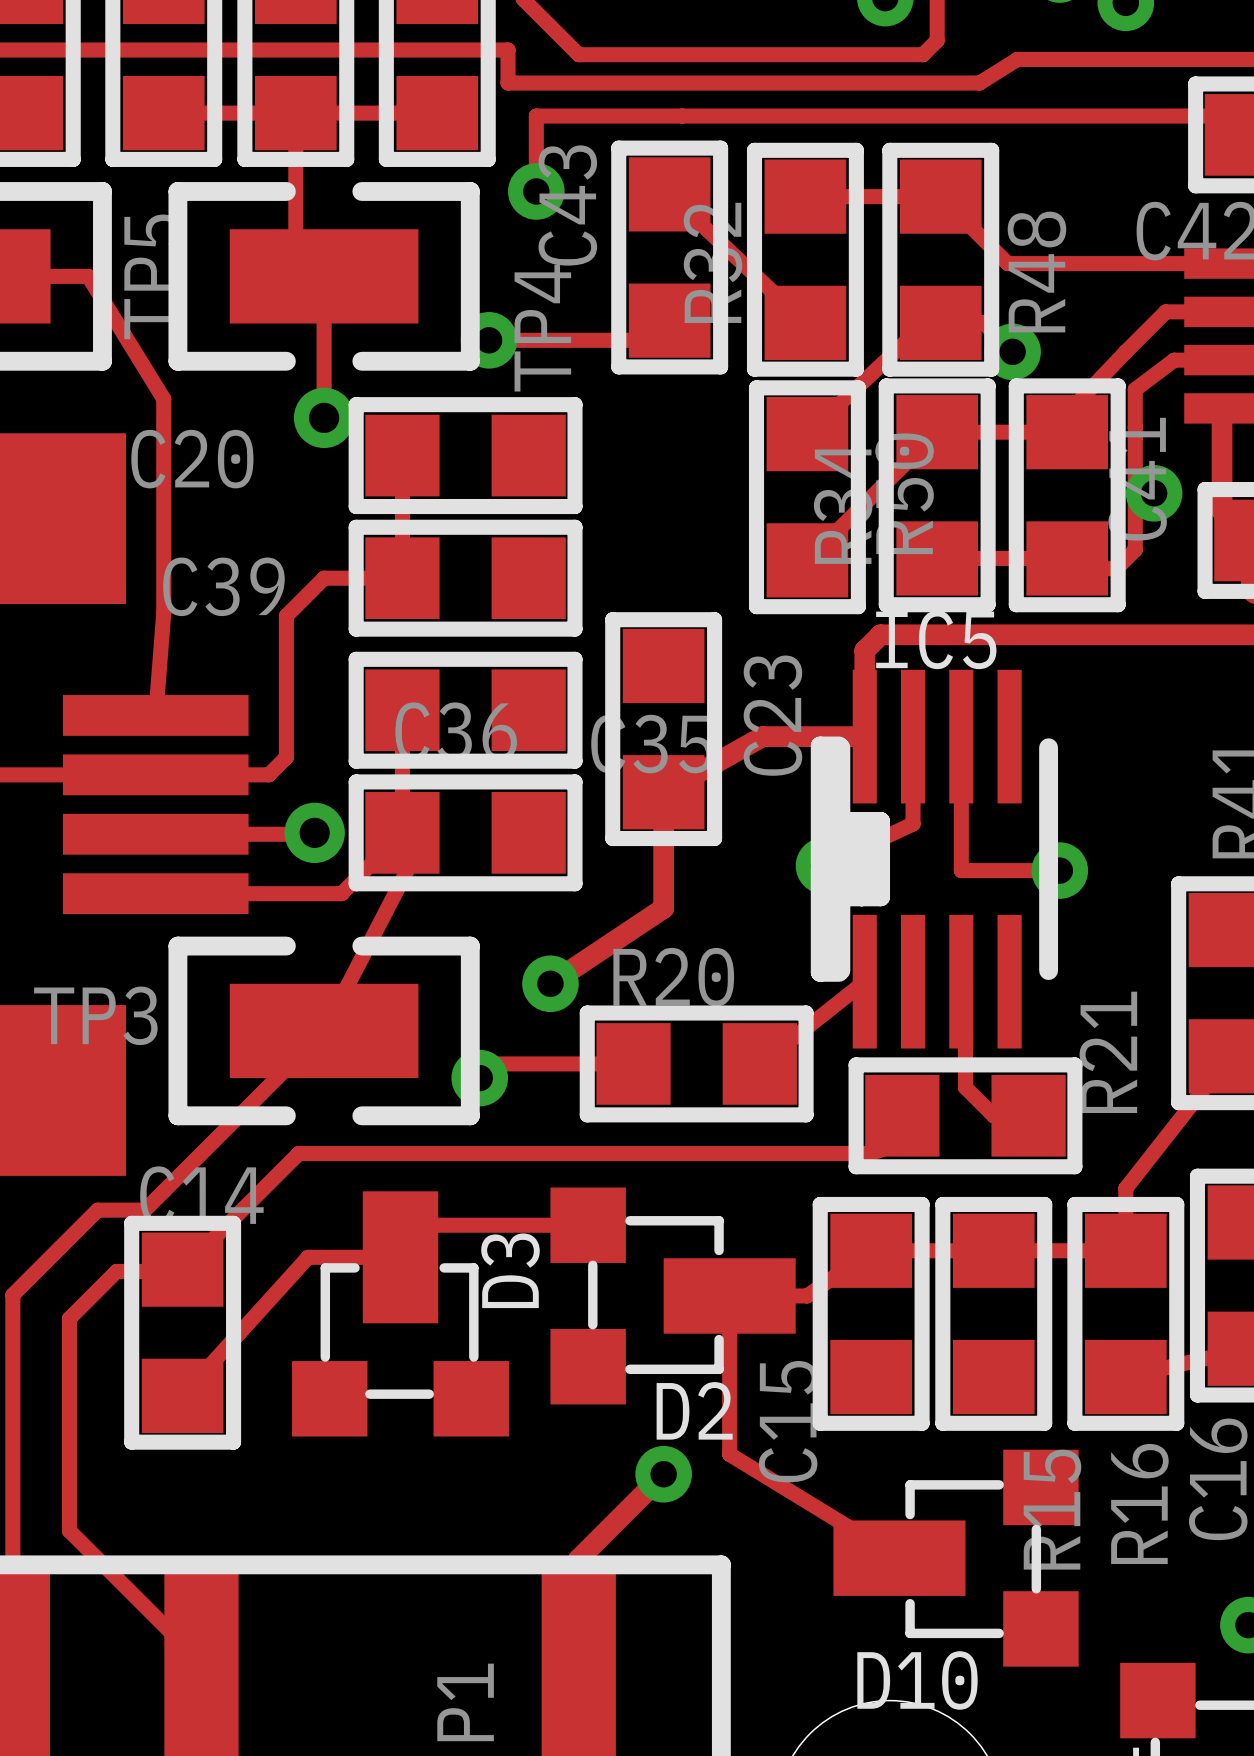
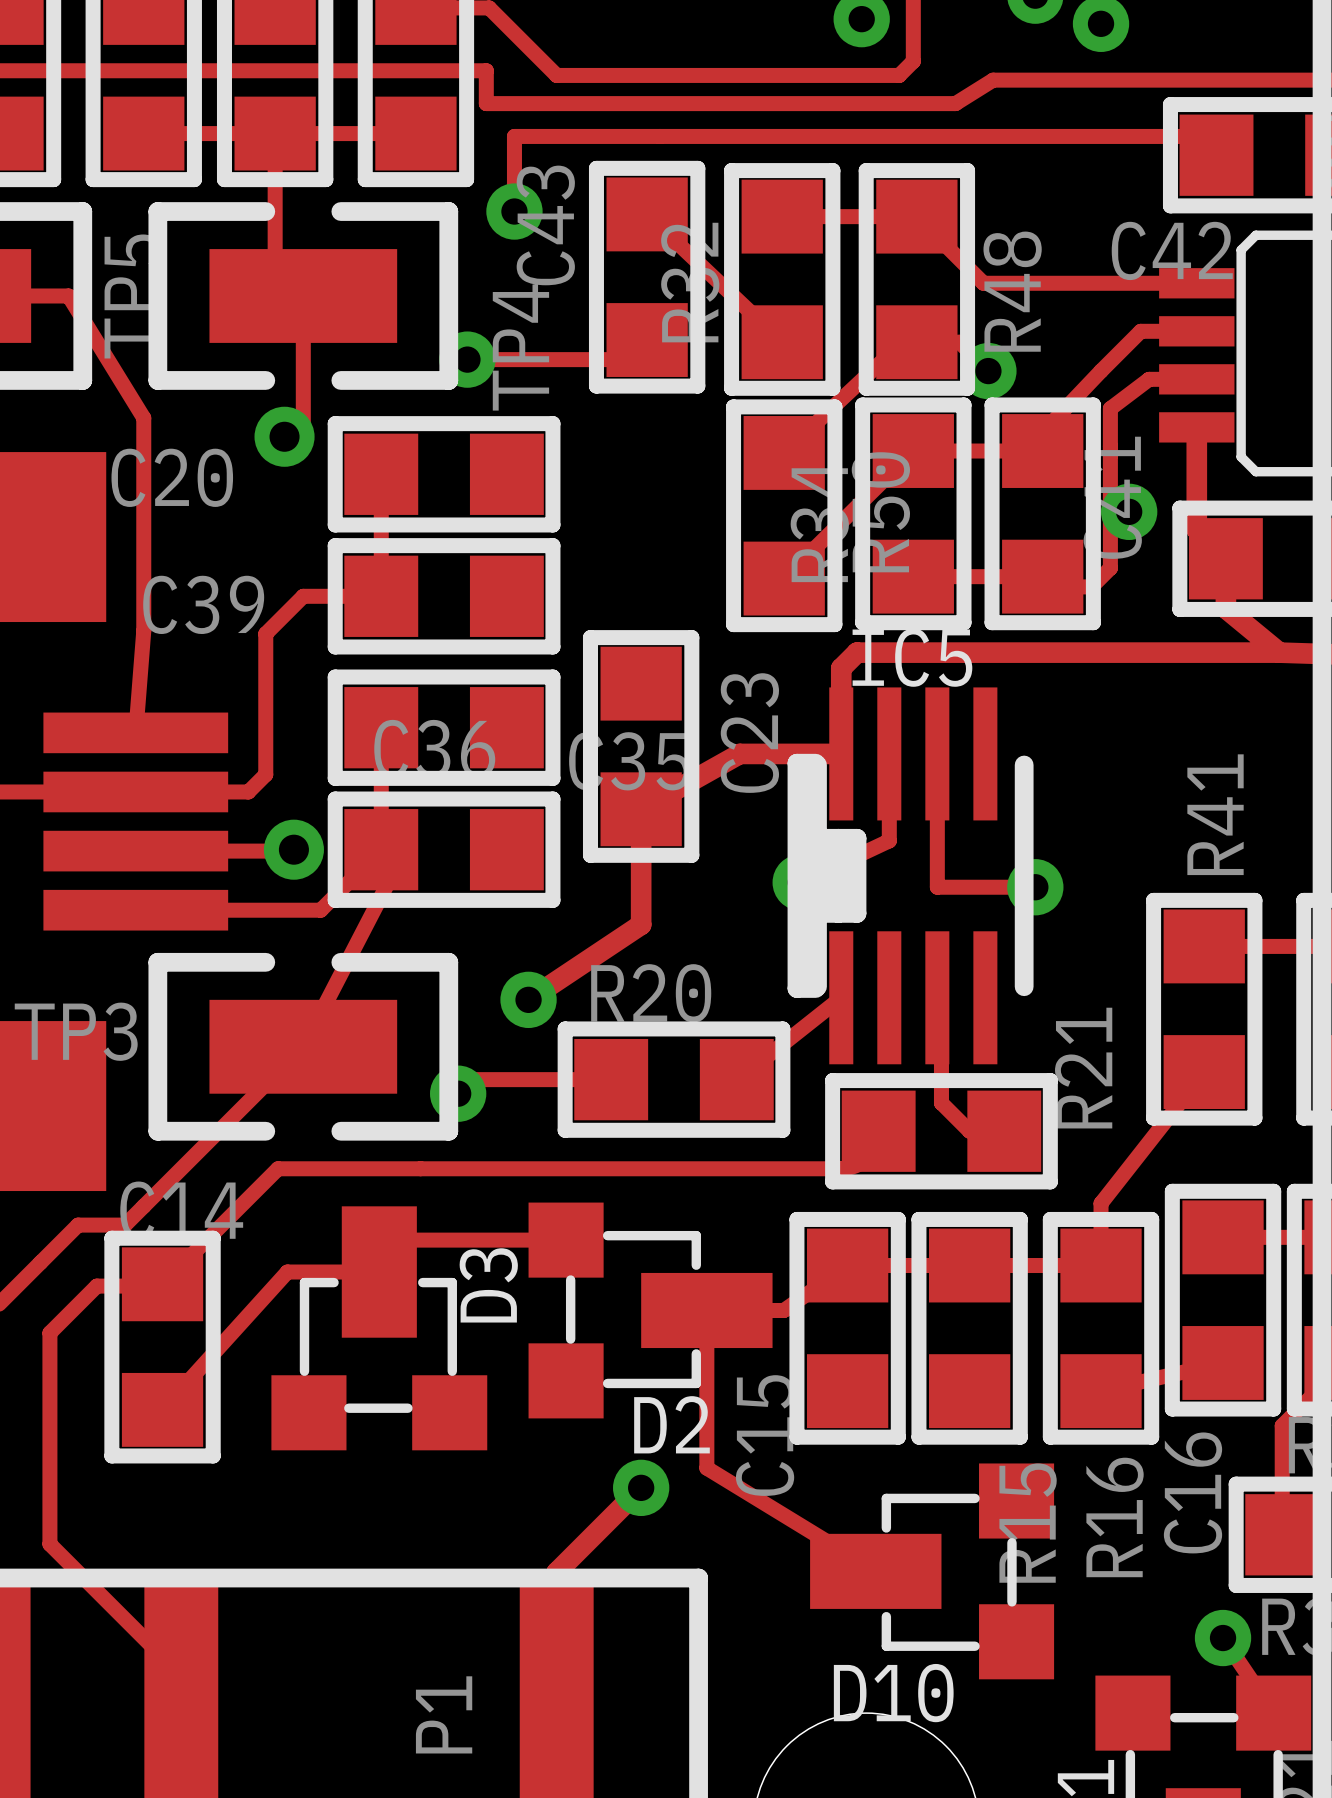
via position: (324, 417) -> (284, 436)

